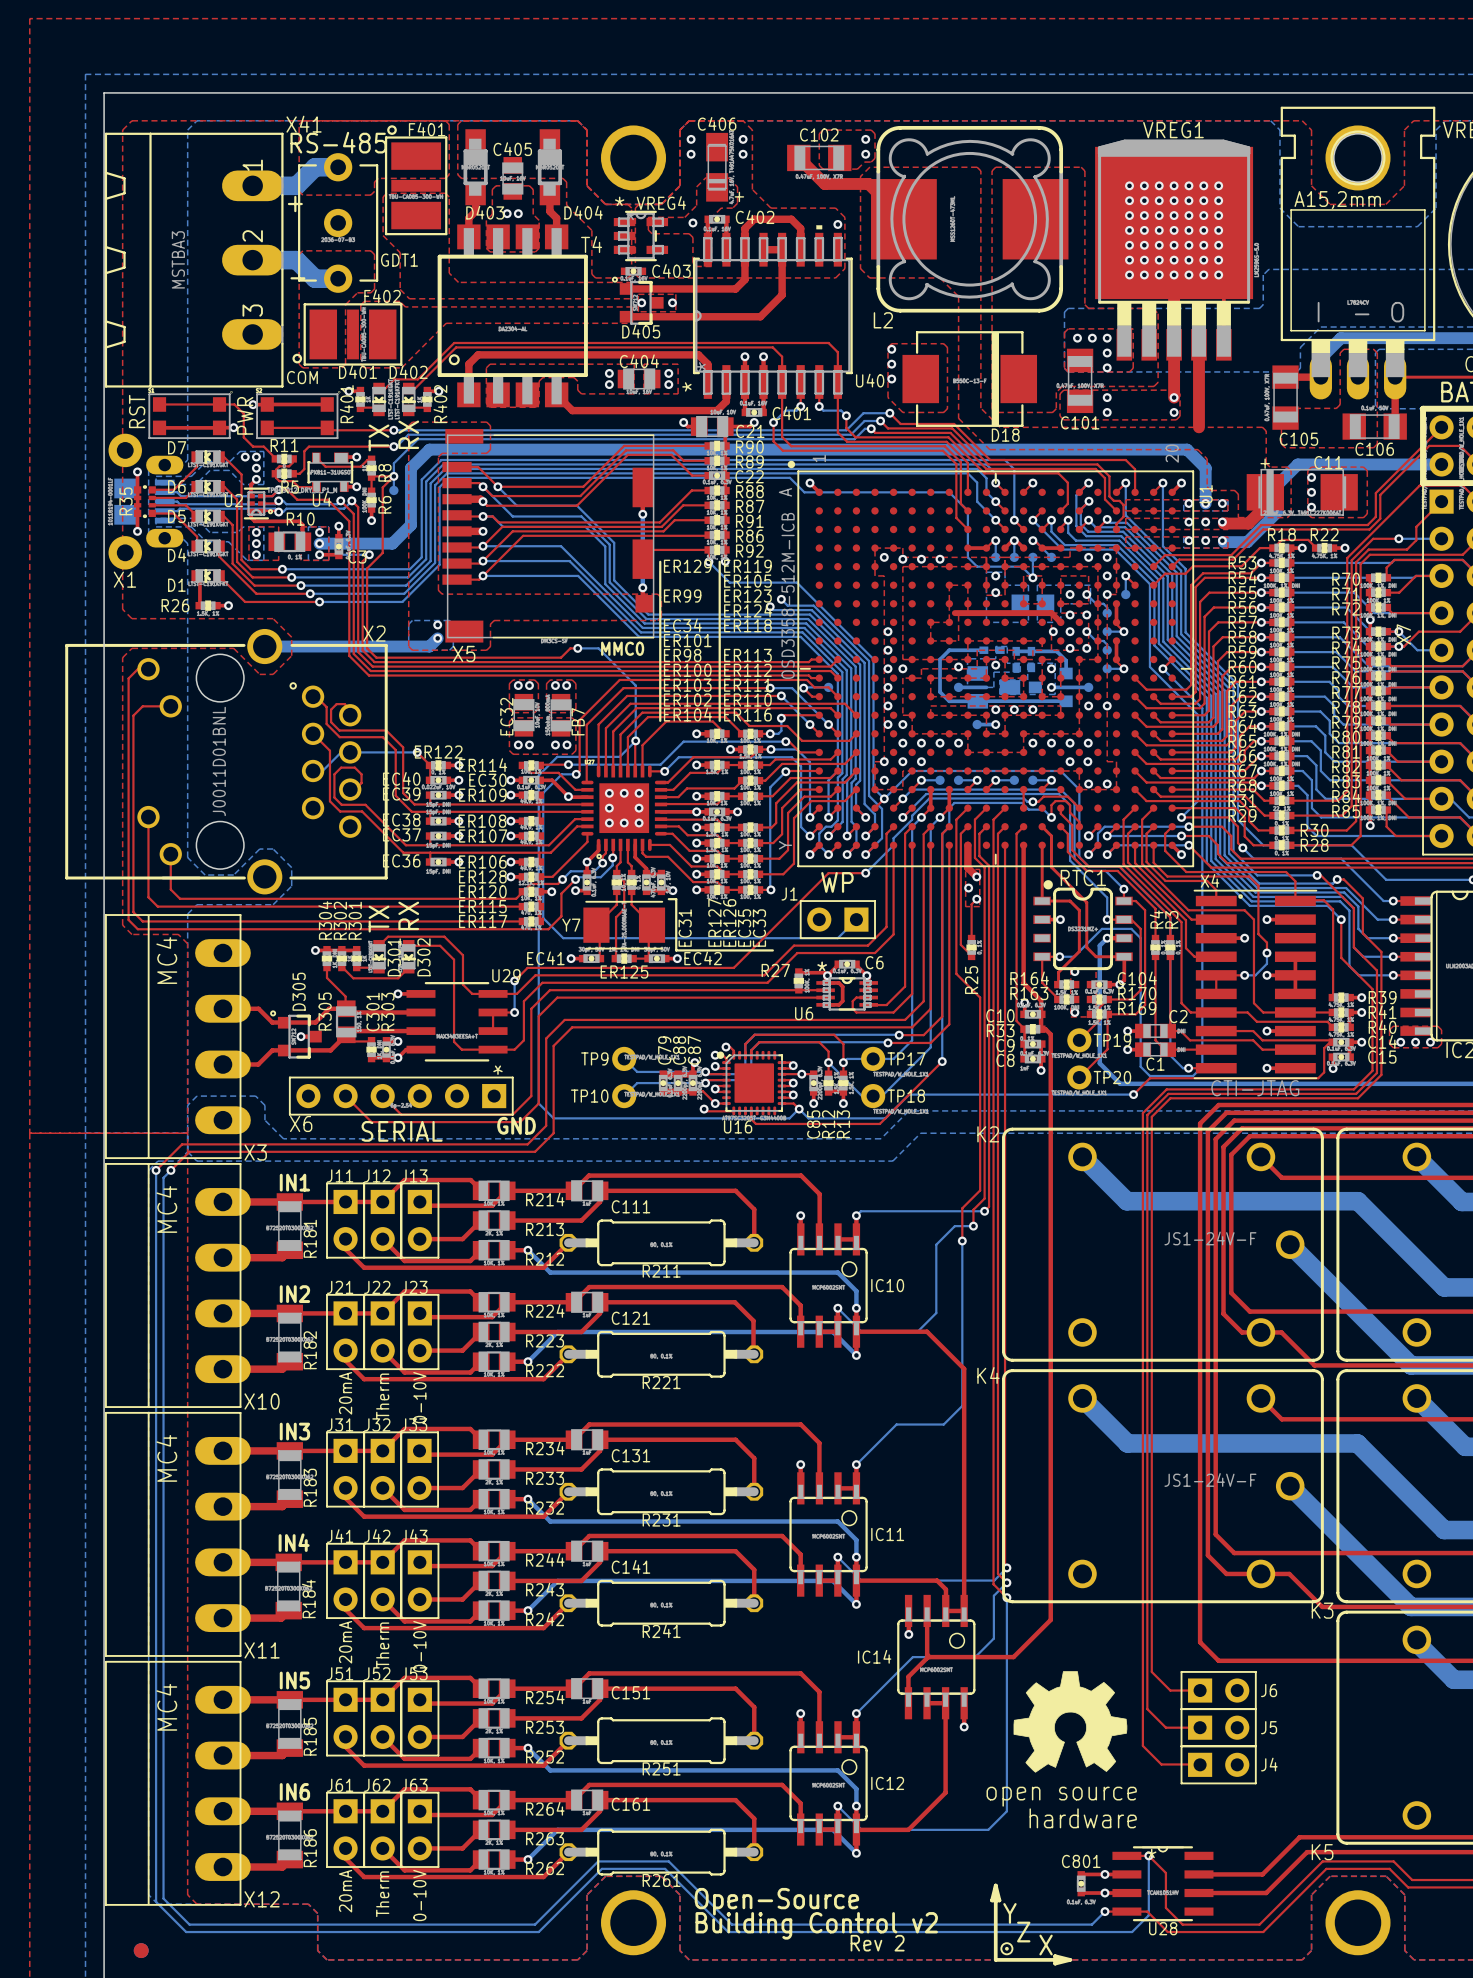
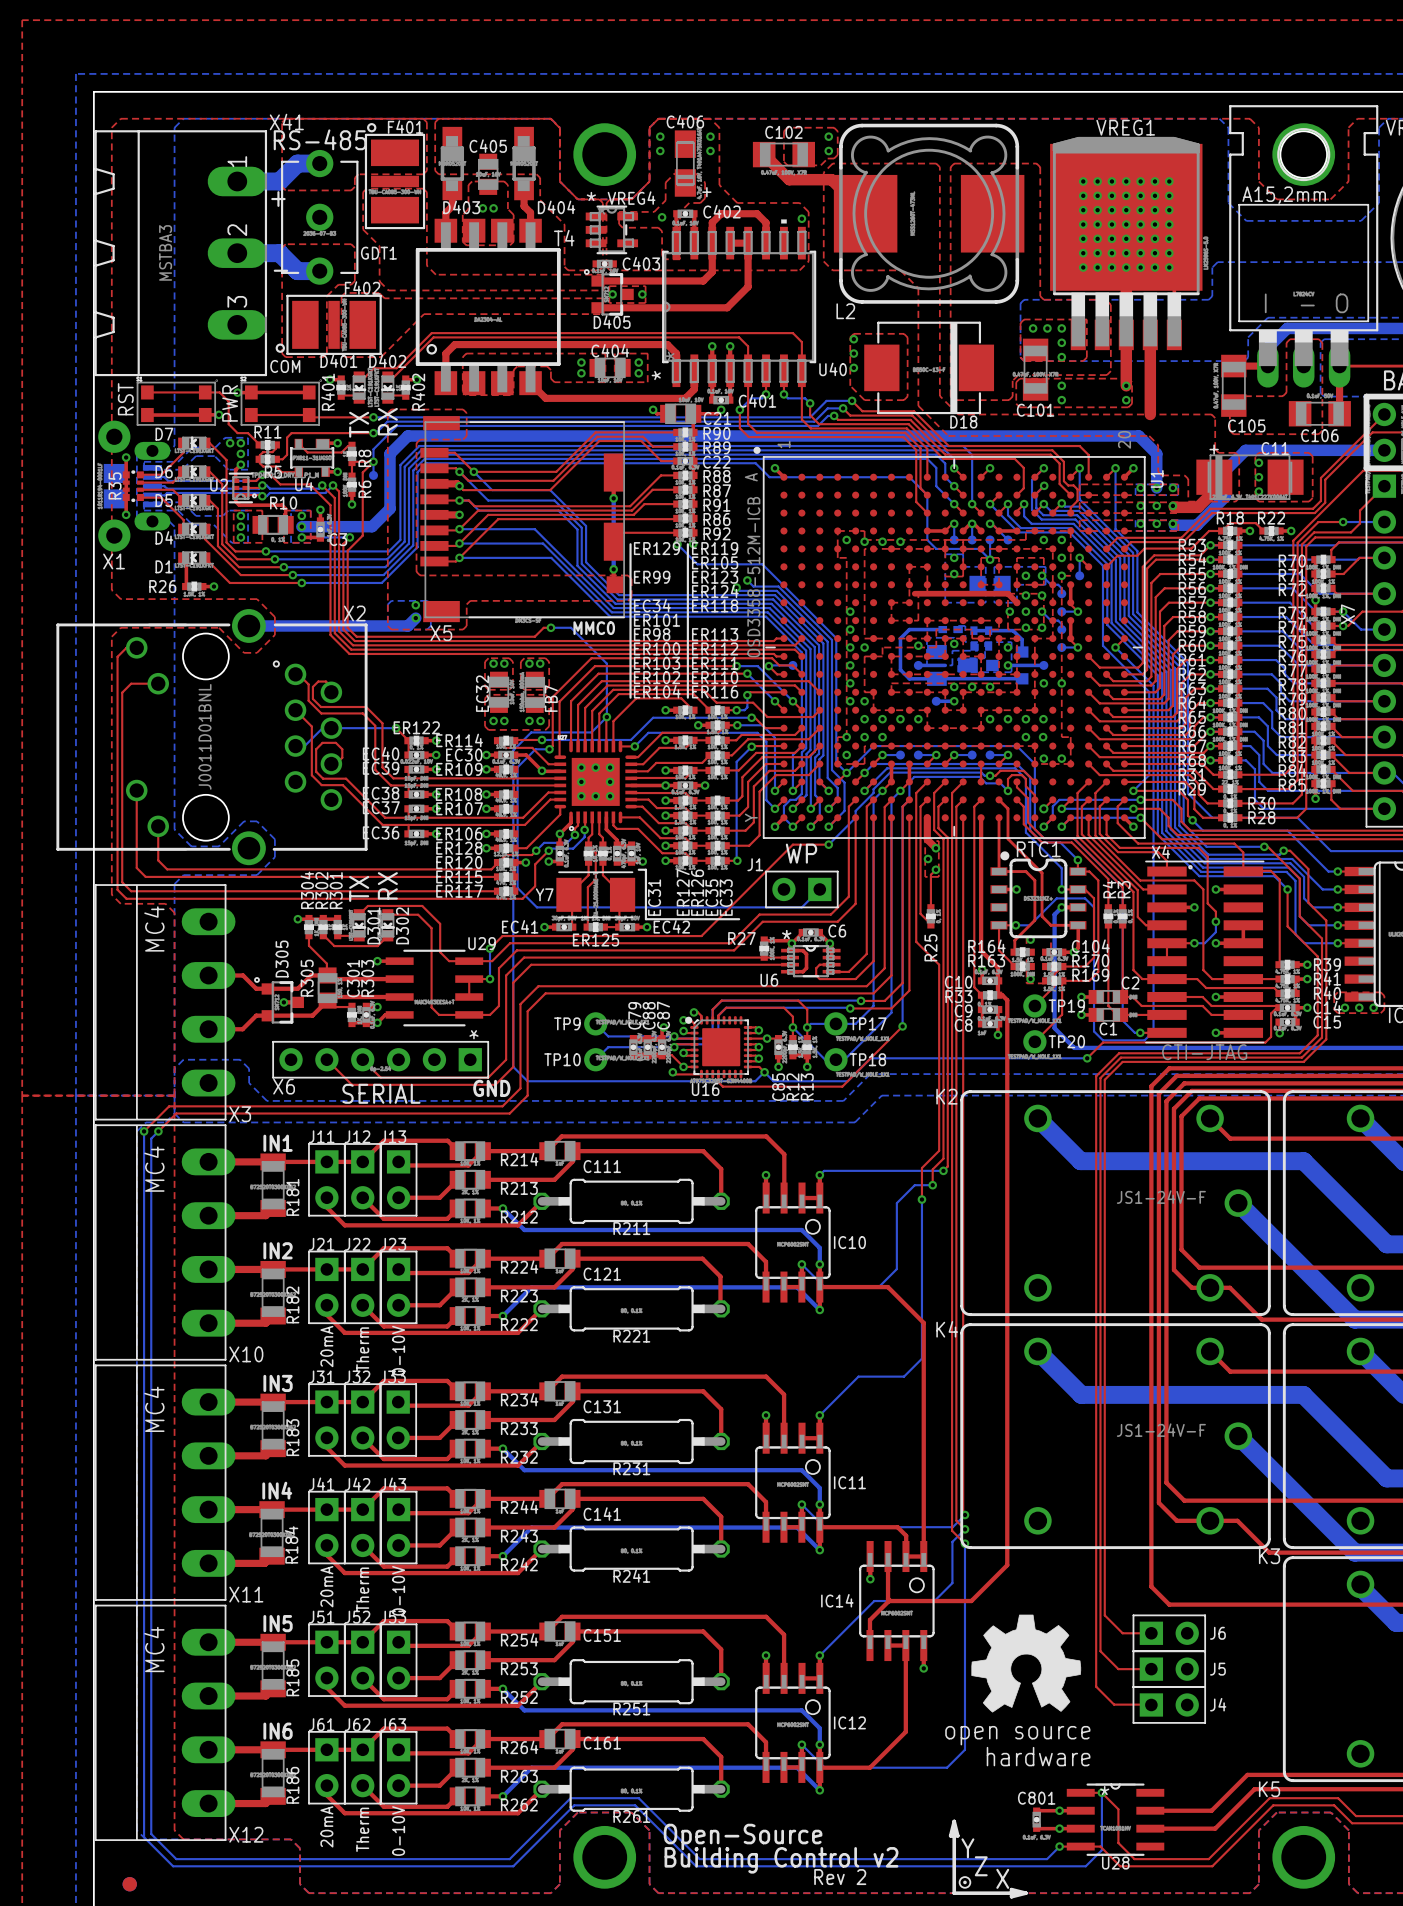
top track: (1295, 975) (1295, 993) -> none

